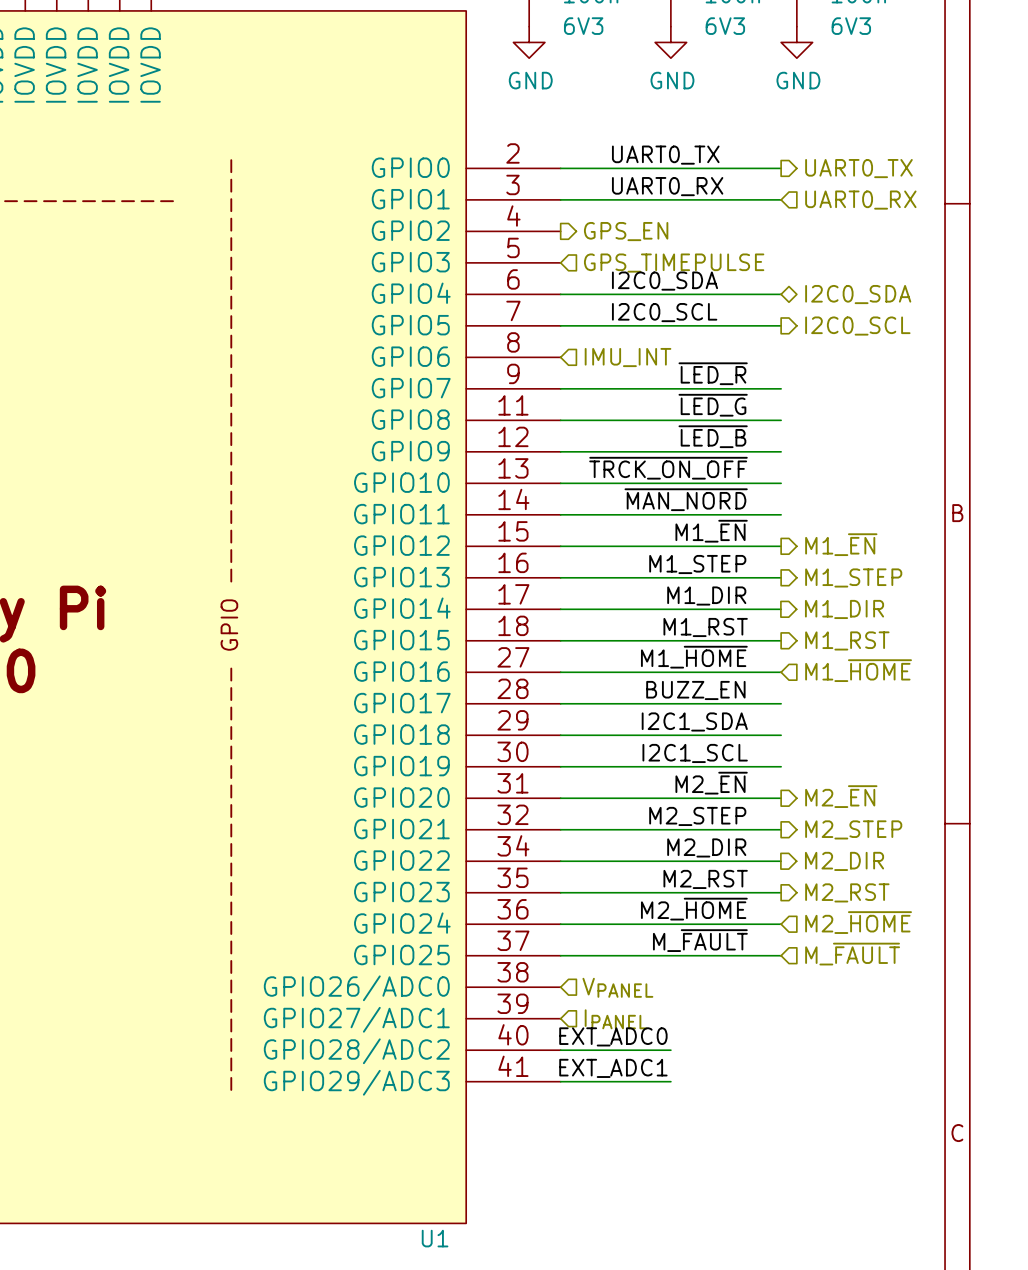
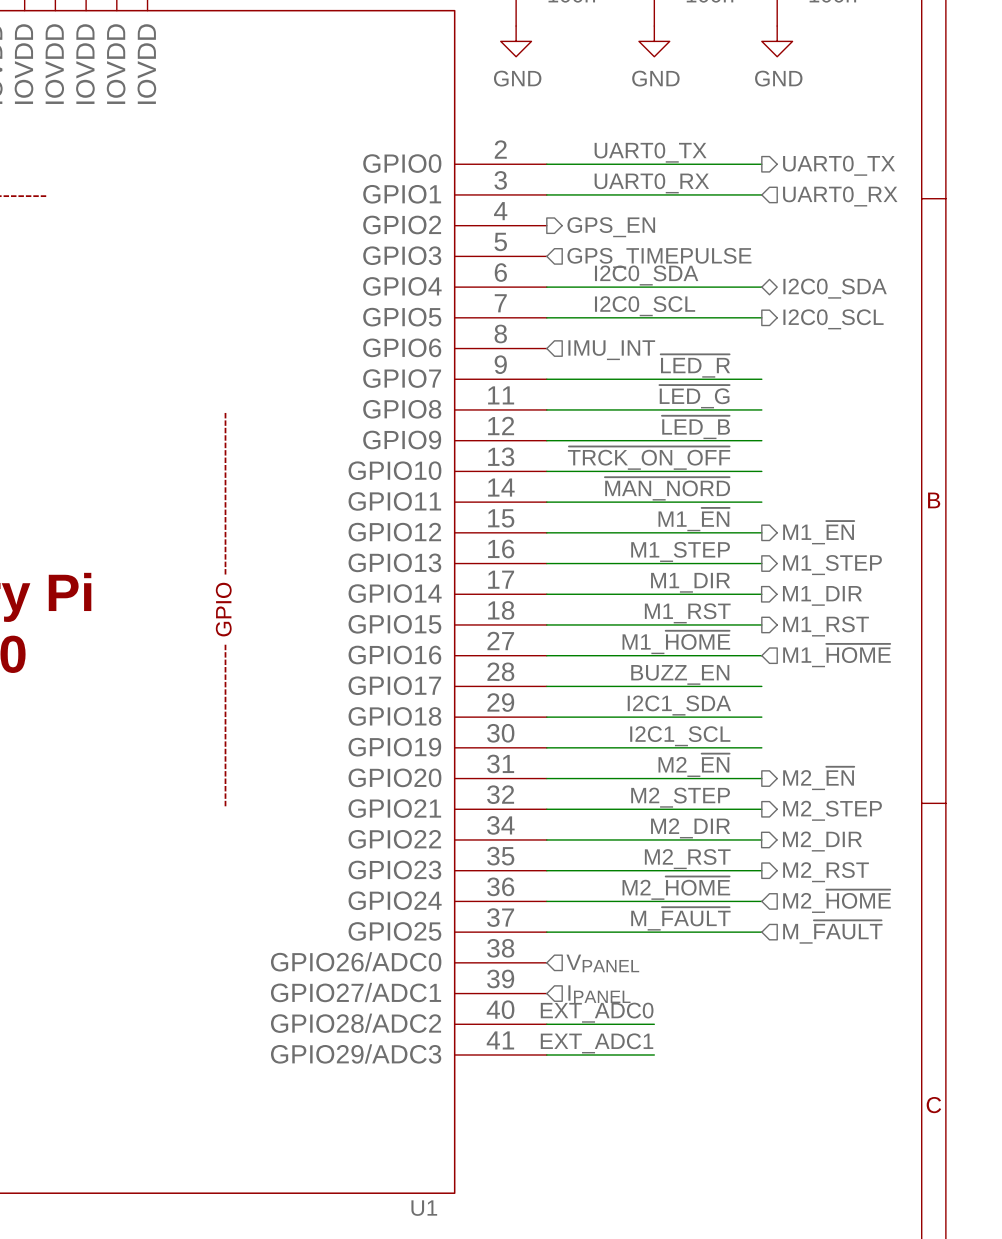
part text: 6V3 (583, 26) -> none
part text: 6V3 (725, 26) -> none
part text: 6V3 (851, 26) -> none

